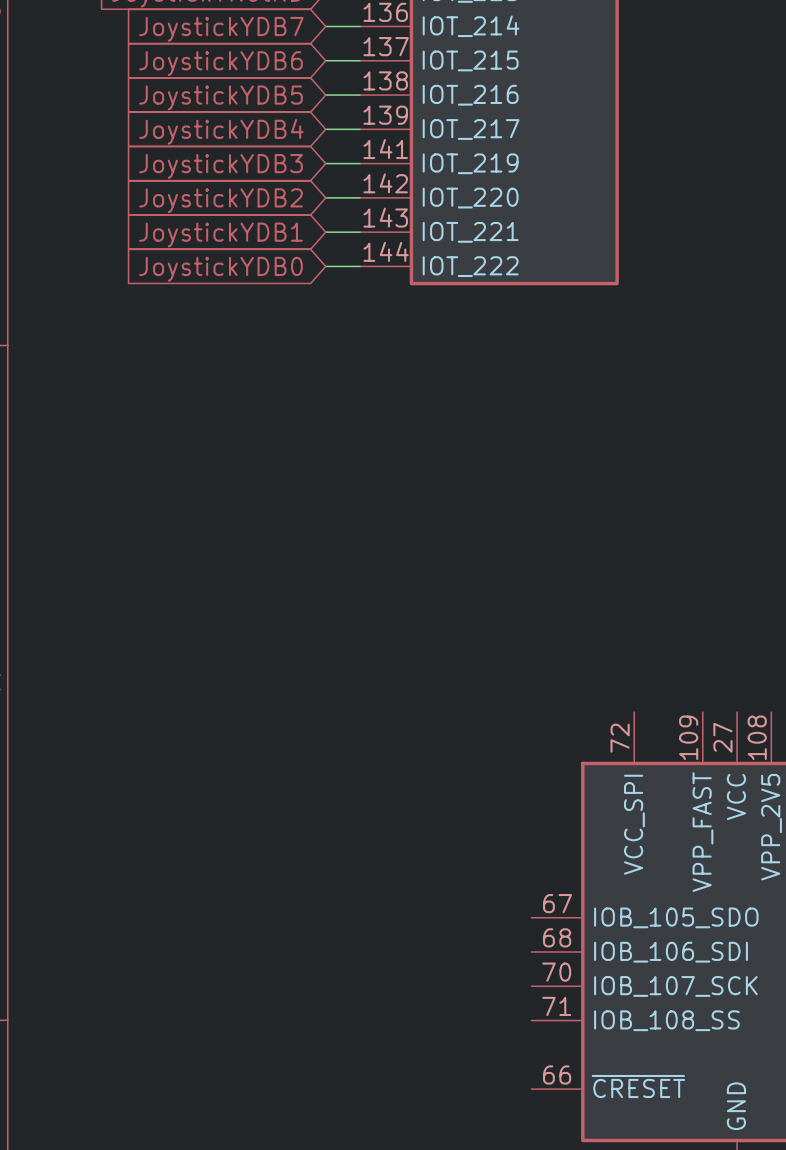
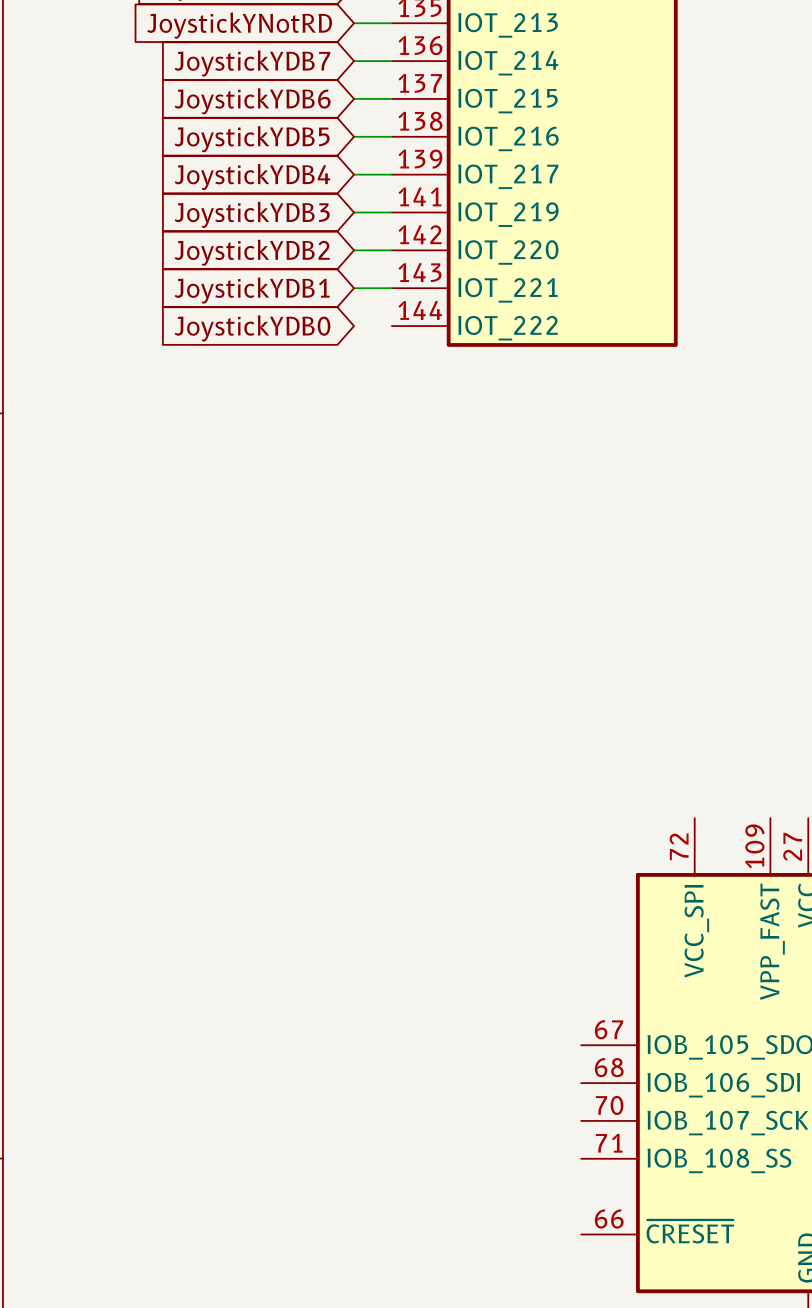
wire: (325, 266) (360, 266) -> none

